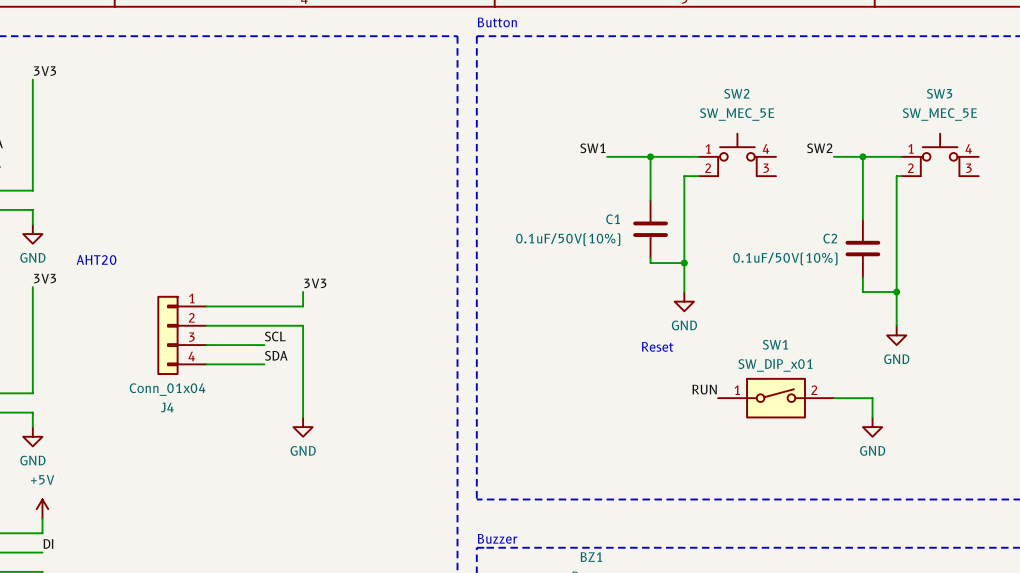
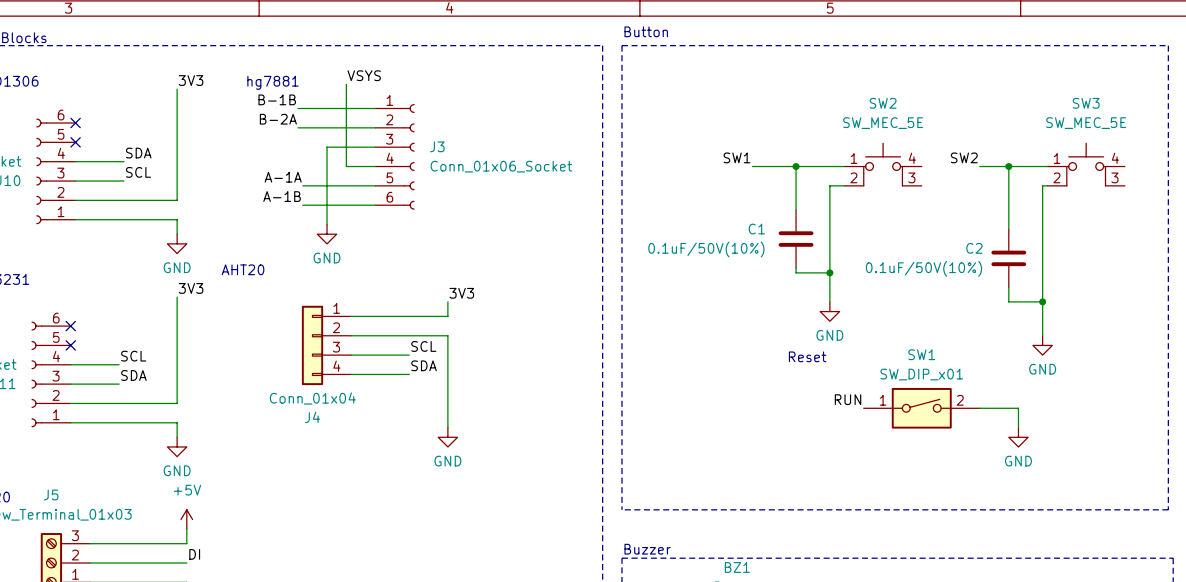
label: none -> VSYS (364, 75)
text: none -> hg7881 (272, 82)
wire: none -> (346, 84) (346, 166) (375, 166)
label: none -> B-1B (277, 99)
wire: none -> (298, 108) (375, 108)
label: none -> B-2A (278, 119)
wire: none -> (298, 127) (375, 127)
wire: none -> (375, 147) (327, 147) (327, 224)
J3: none -> Conn_01x06_Socket (395, 156)
label: none -> A-1A (283, 177)
wire: none -> (302, 185) (375, 185)
label: none -> A-1B (282, 196)
wire: none -> (302, 205) (375, 205)
power symbol: none -> GND (327, 234)

